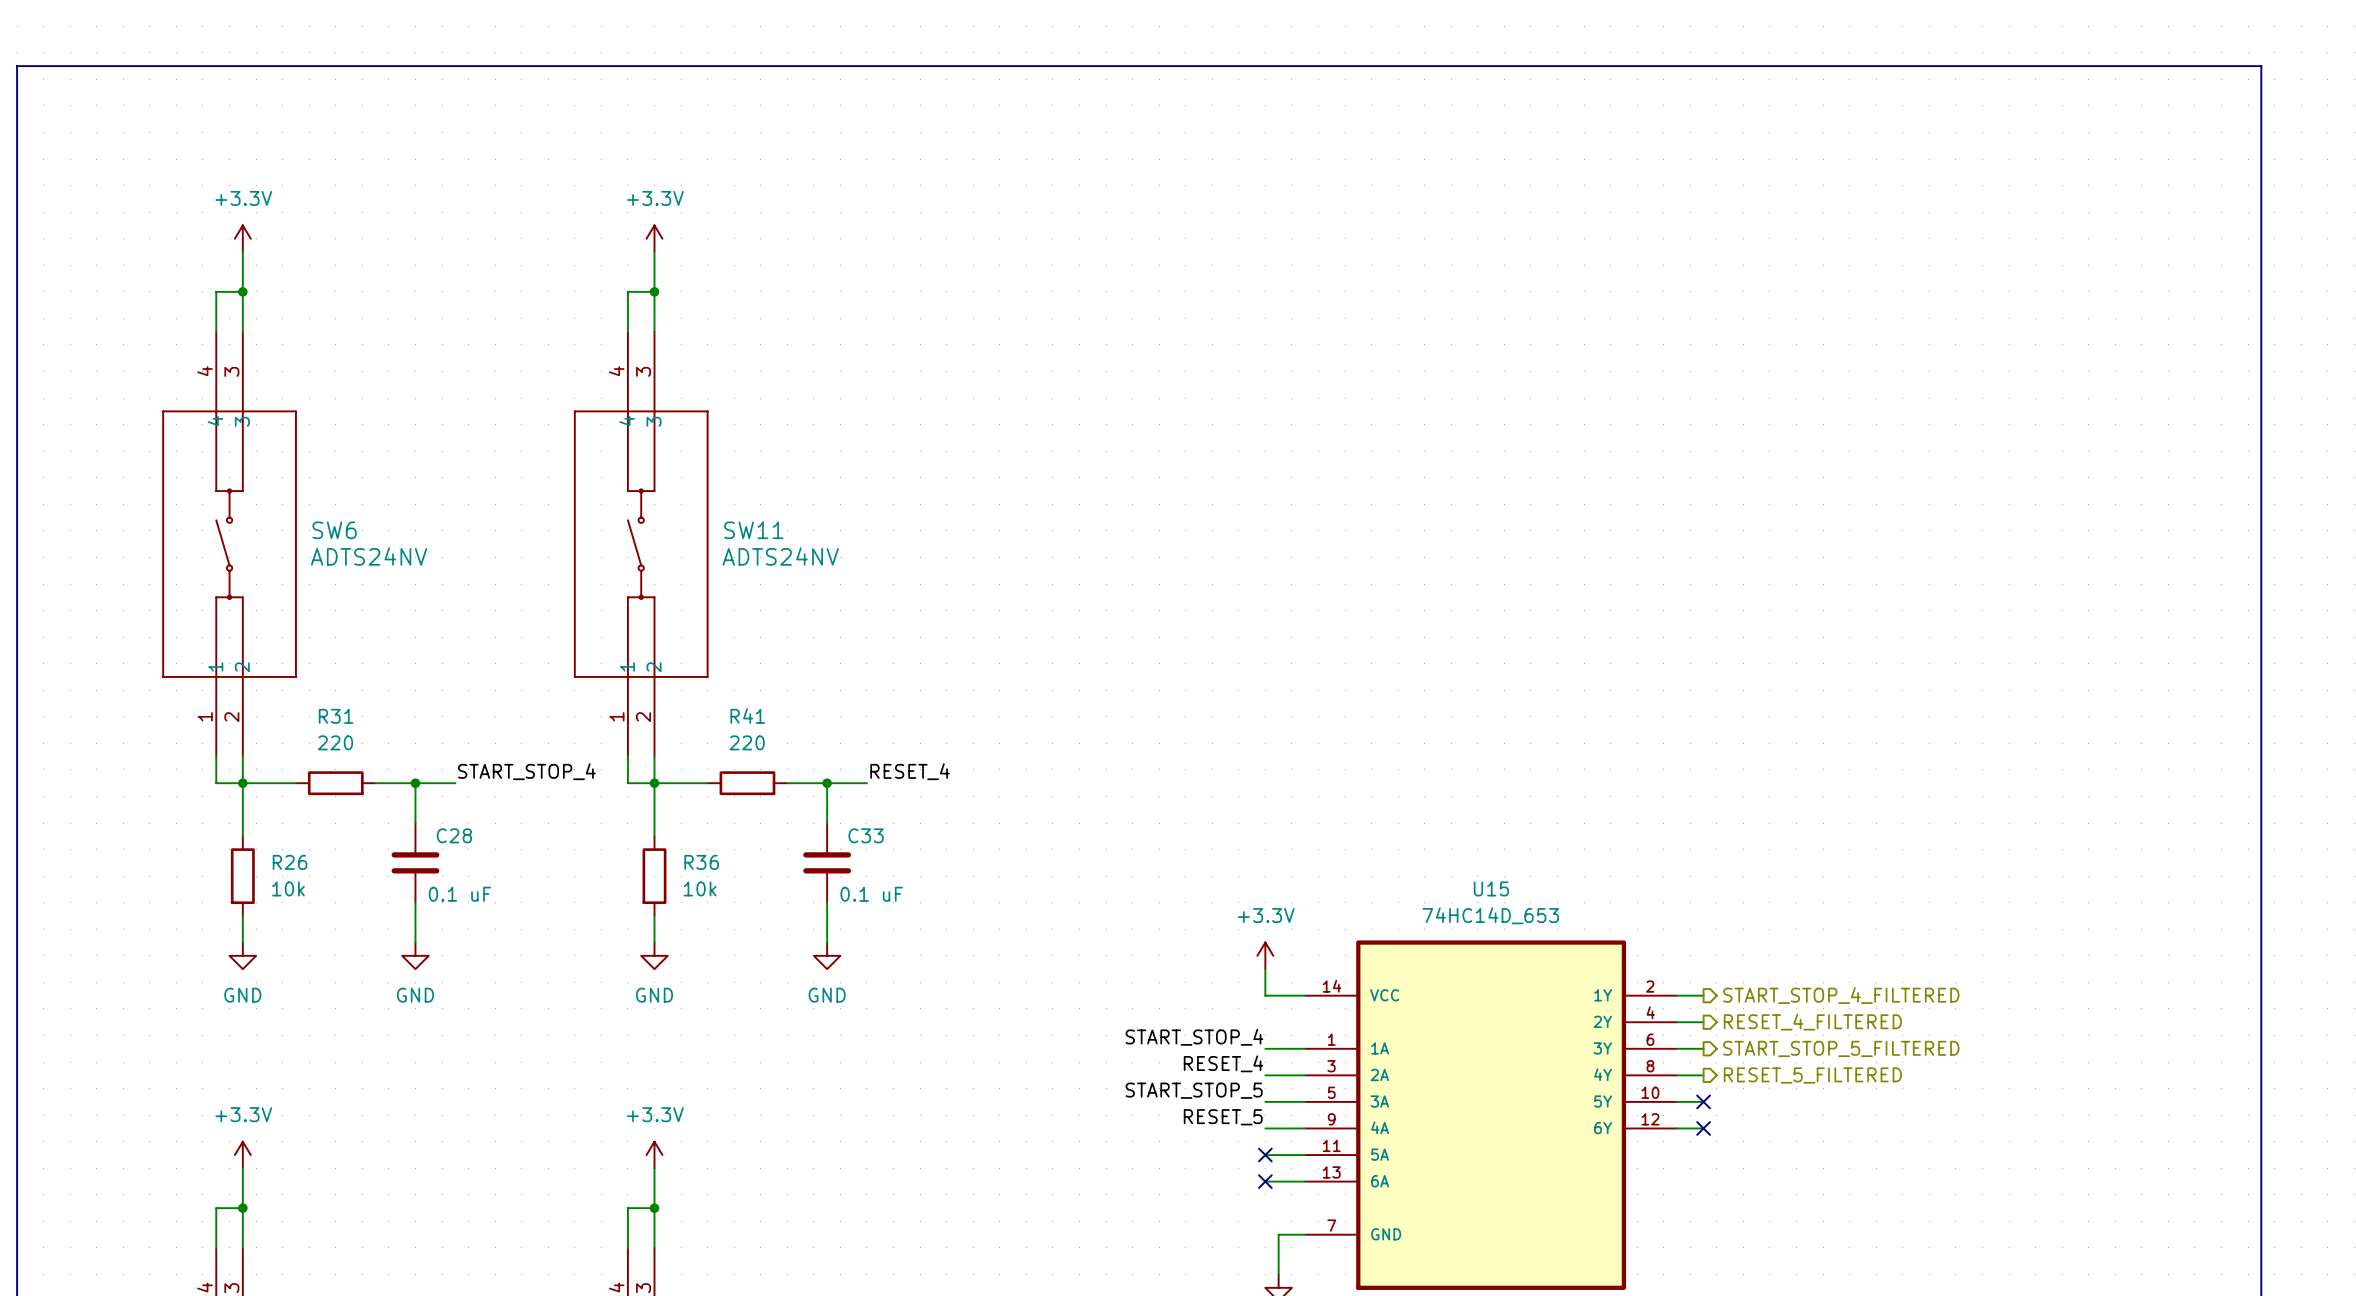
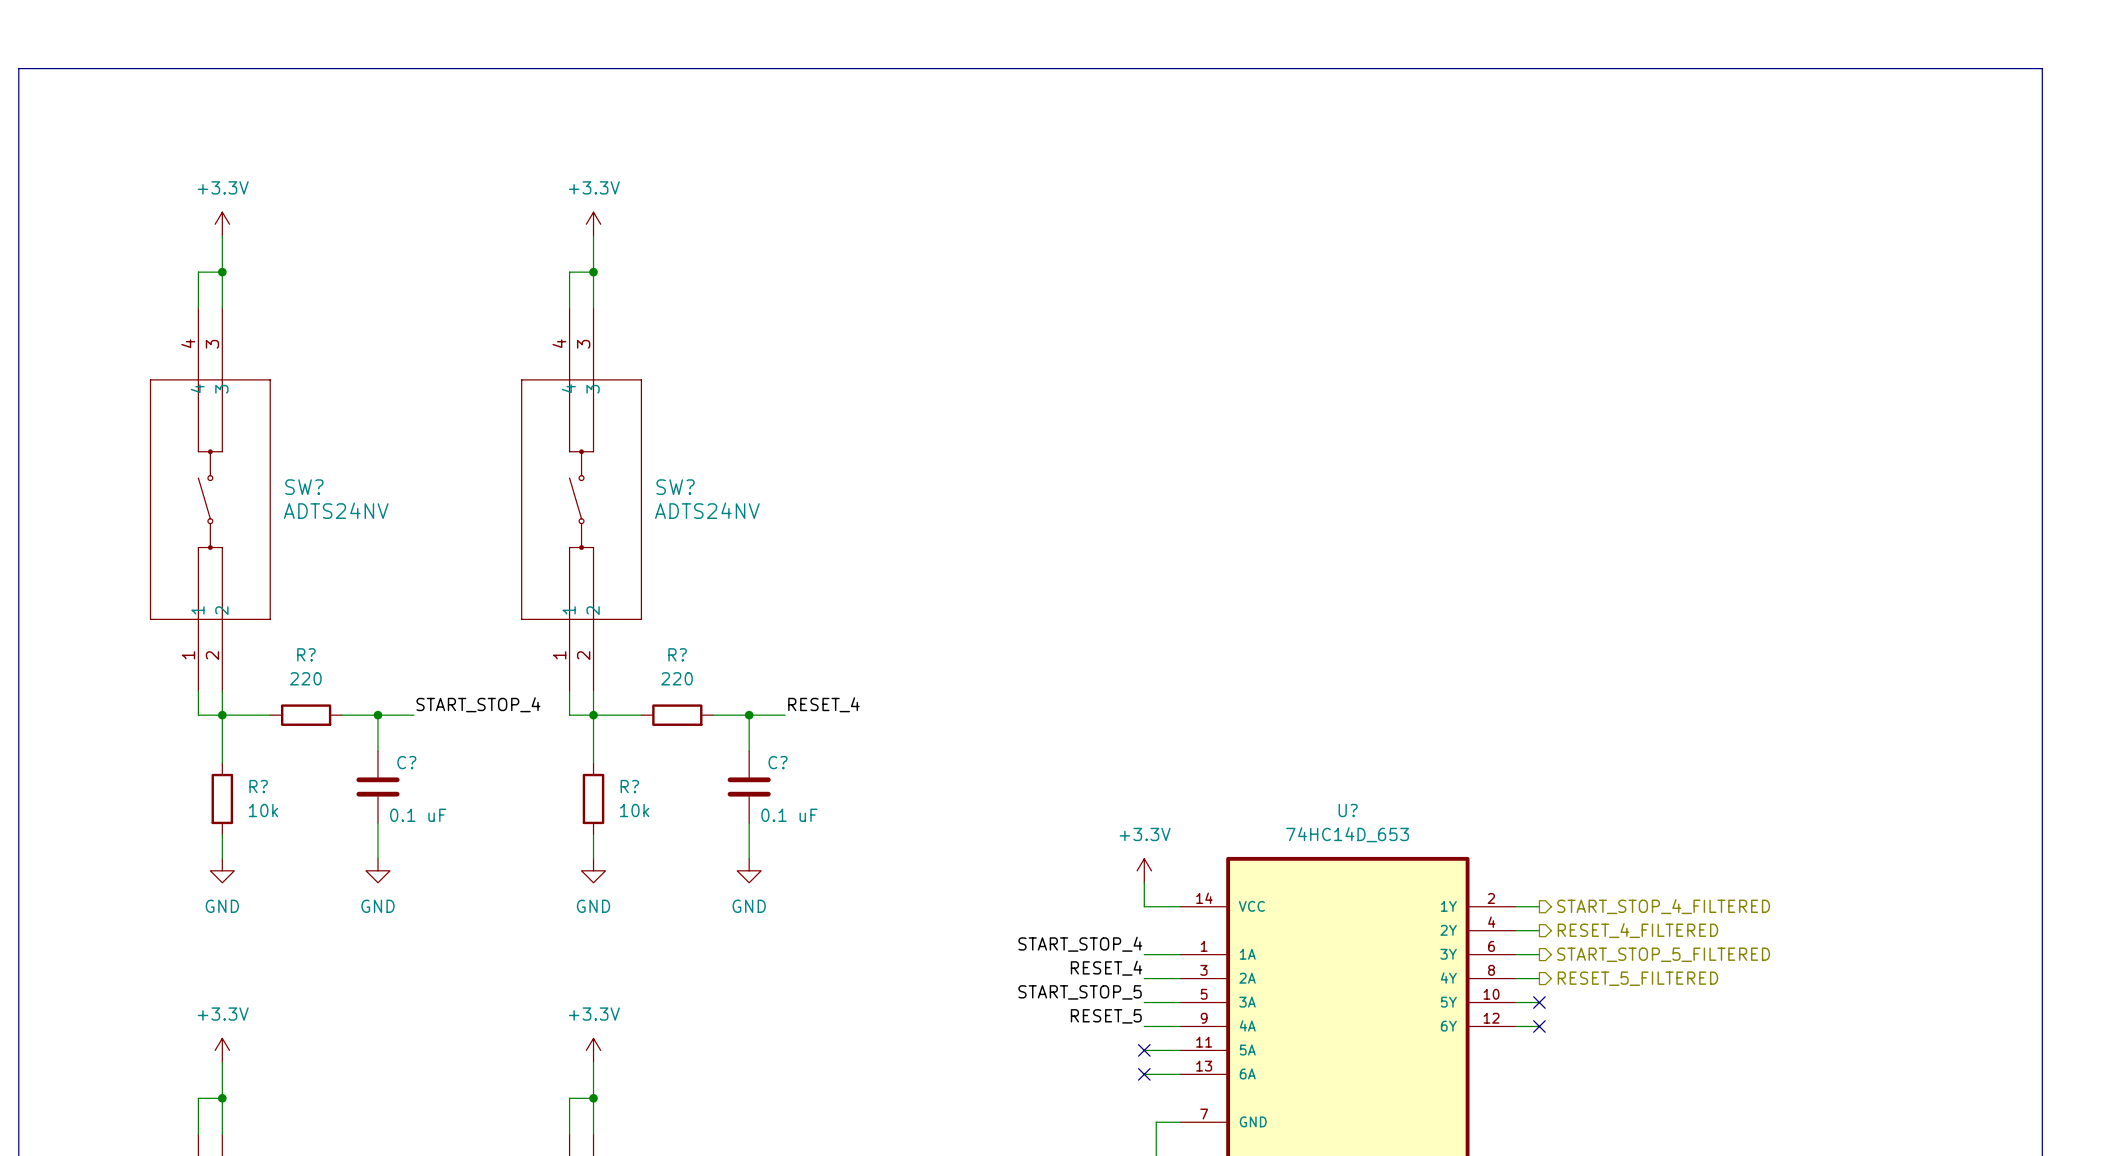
SW6 name: SW6 (334, 530) -> SW? (304, 487)
SW11 name: SW11 (753, 530) -> SW? (675, 487)
R31 name: R31 (336, 716) -> R? (306, 654)
R41 name: R41 (747, 716) -> R? (677, 654)
C28 name: C28 (454, 835) -> C? (406, 762)
C33 name: C33 (866, 835) -> C? (778, 762)
R26 name: R26 (290, 862) -> R? (258, 786)
R36 name: R36 (701, 862) -> R? (629, 786)
U15 name: U15 (1491, 888) -> U? (1348, 810)

